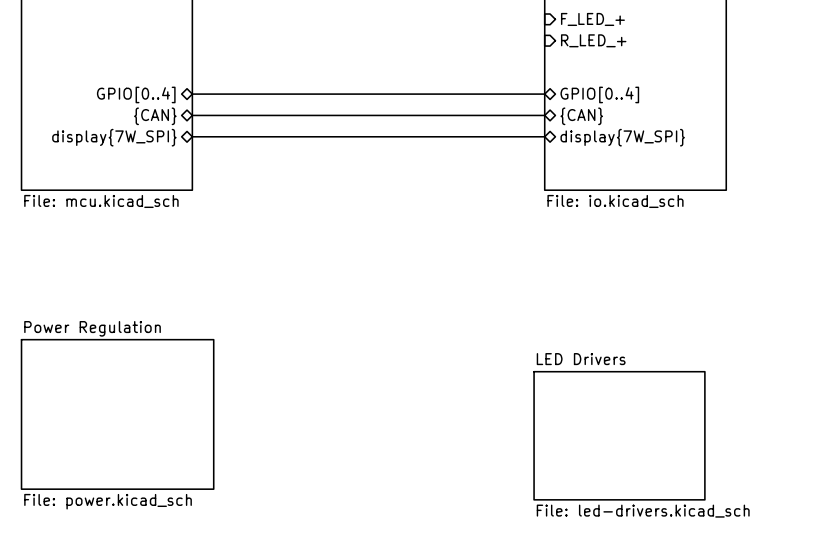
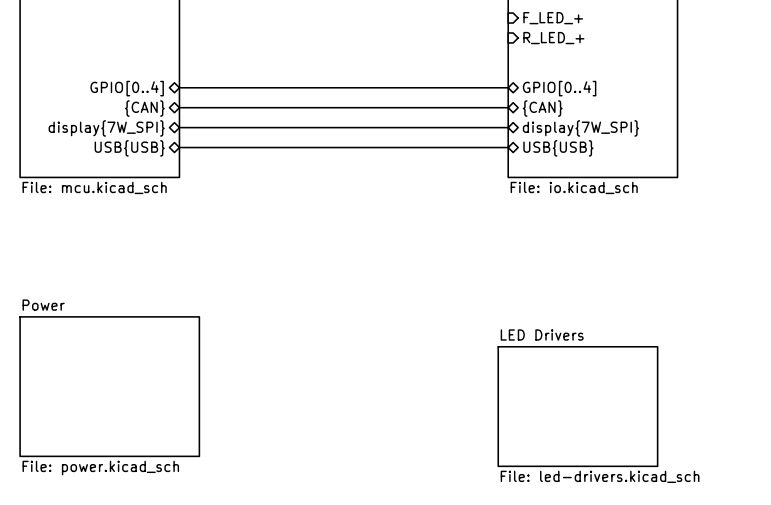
bus: none -> (179, 147) (508, 147)
sheet pin: none -> USB{USB} (129, 148)
sheet pin: none -> USB{USB} (558, 148)
sheet Power Regulation name: Power Regulation (92, 328) -> Power (43, 305)

